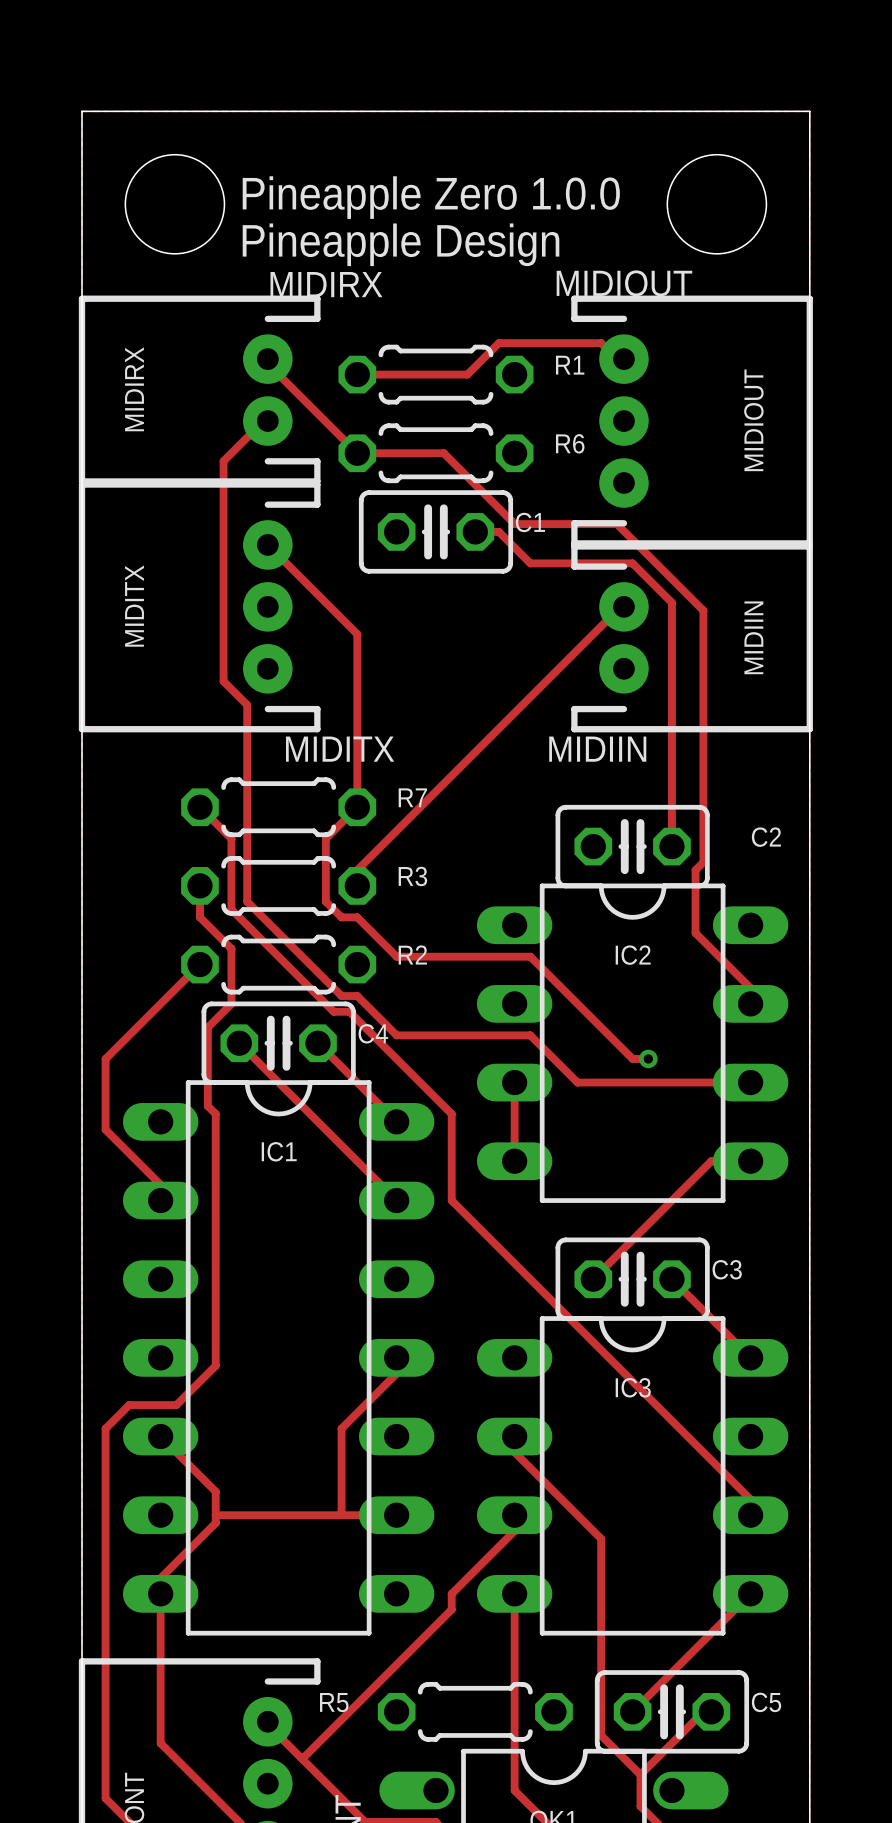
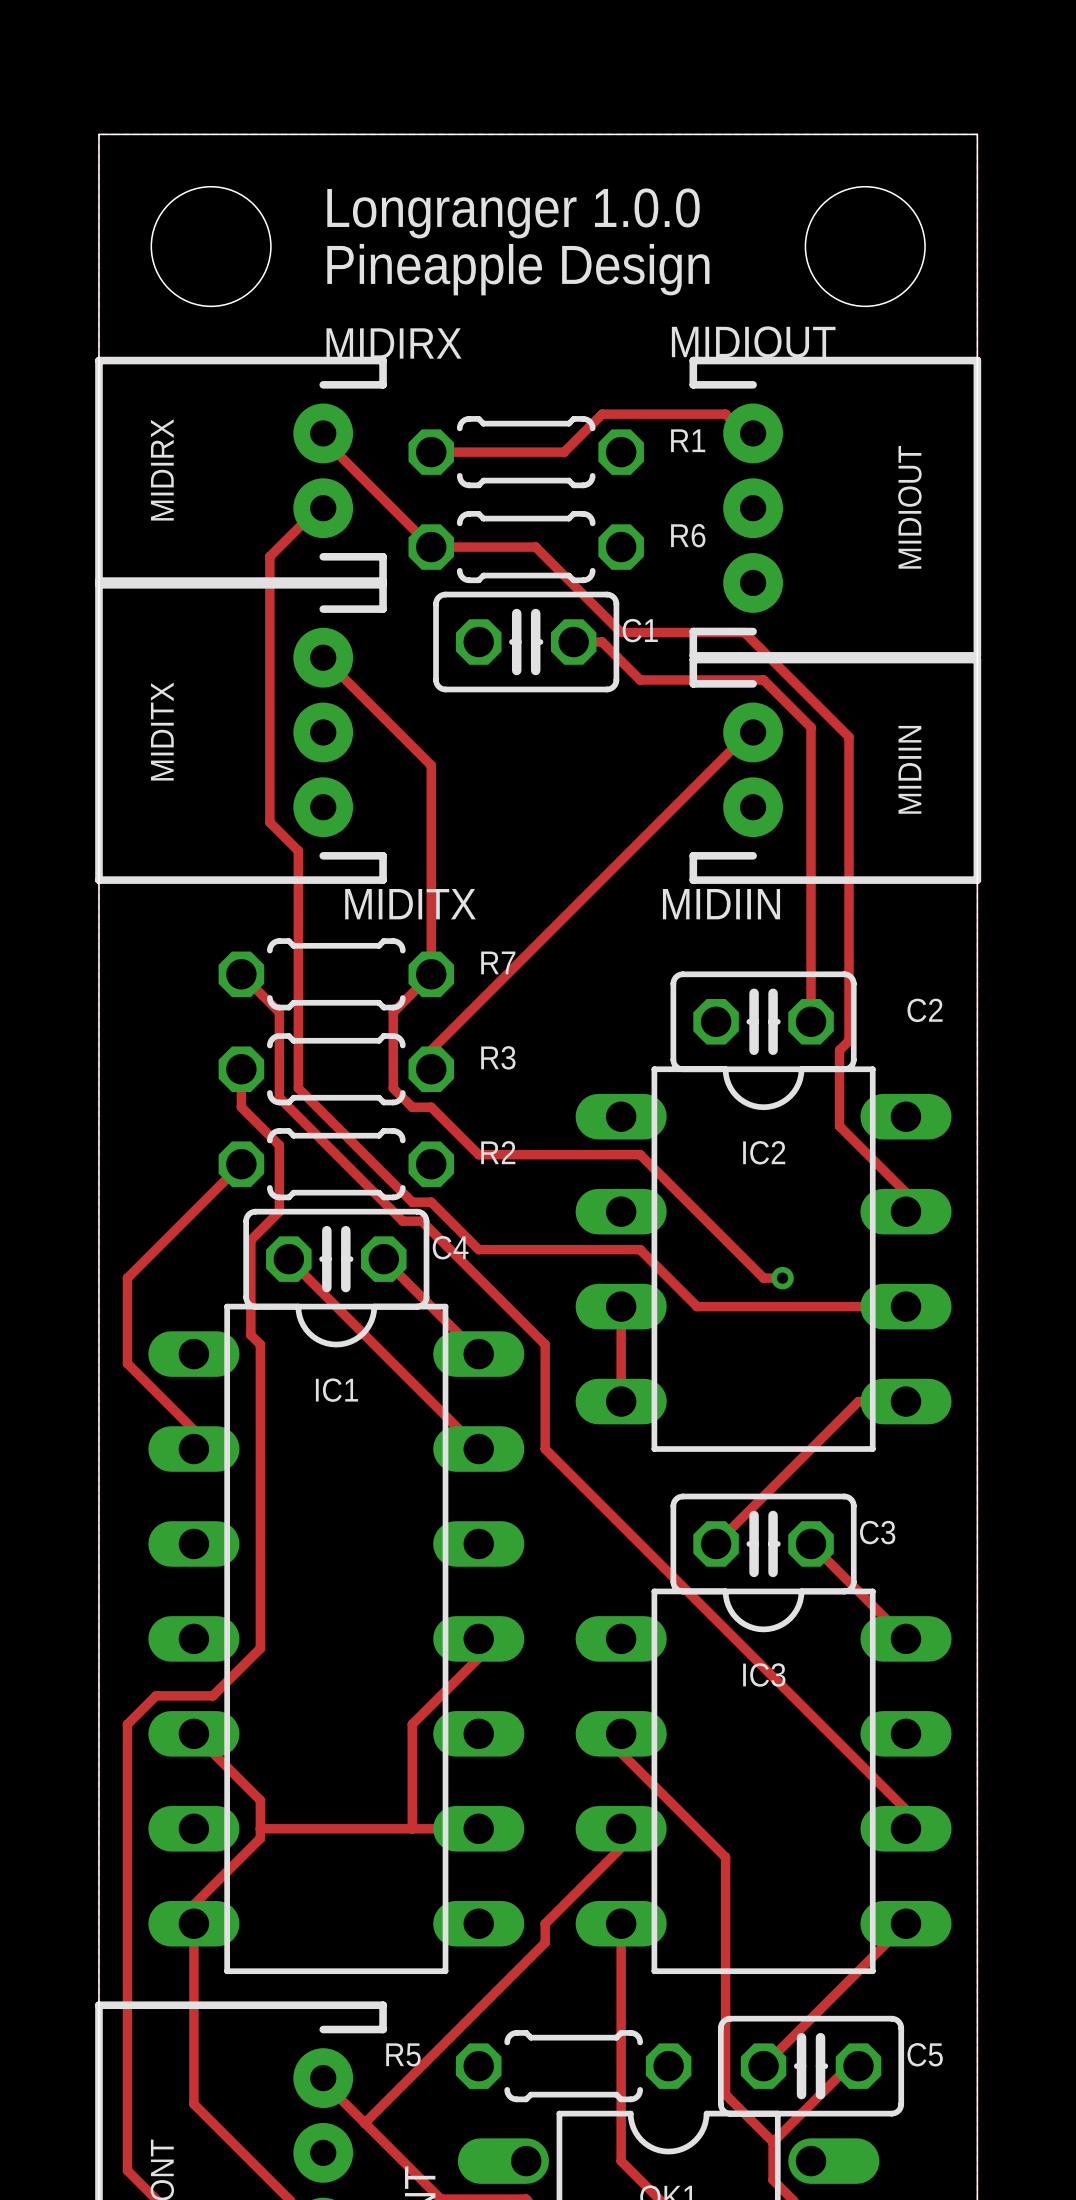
text: none -> Longranger 1.0.0 (513, 213)
text: Pineapple Zero 1.0.0 (431, 197) -> none
text position: Pineapple Design (401, 244) -> Pineapple Design (518, 269)

